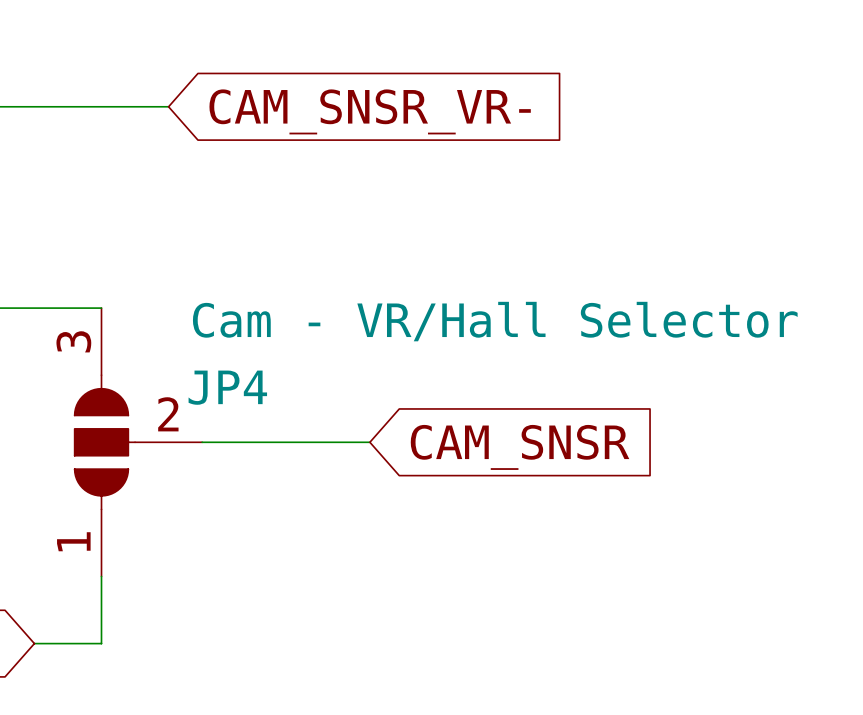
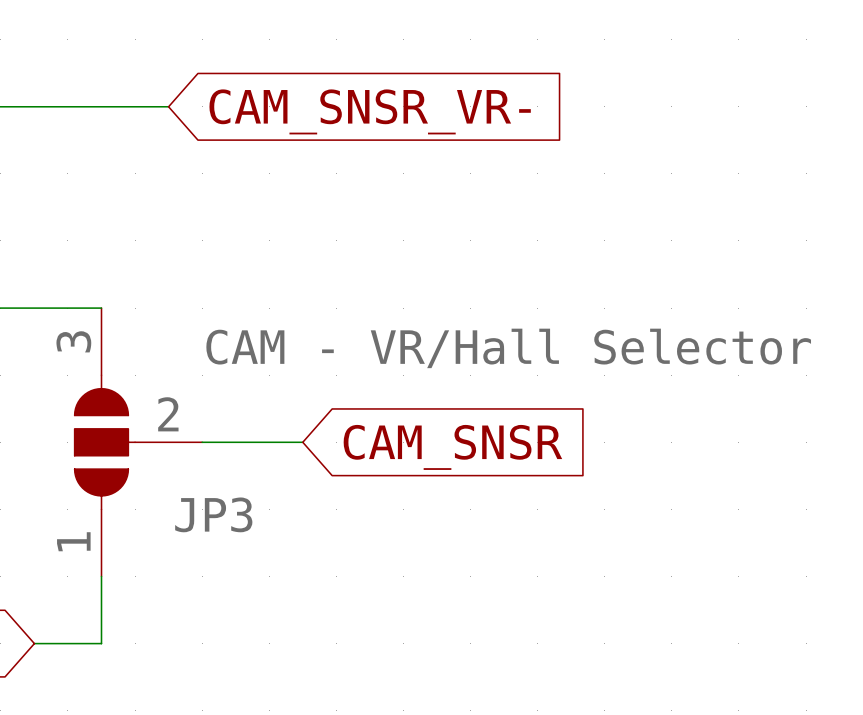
JP4 value: Cam - VR/Hall Selector (495, 321) -> CAM - VR/Hall Selector (508, 348)
JP4 name: JP4 (227, 387) -> JP3 (213, 514)
wire: (302, 442) (369, 442) -> none
global label position: CAM_SNSR (520, 447) -> CAM_SNSR (452, 447)

